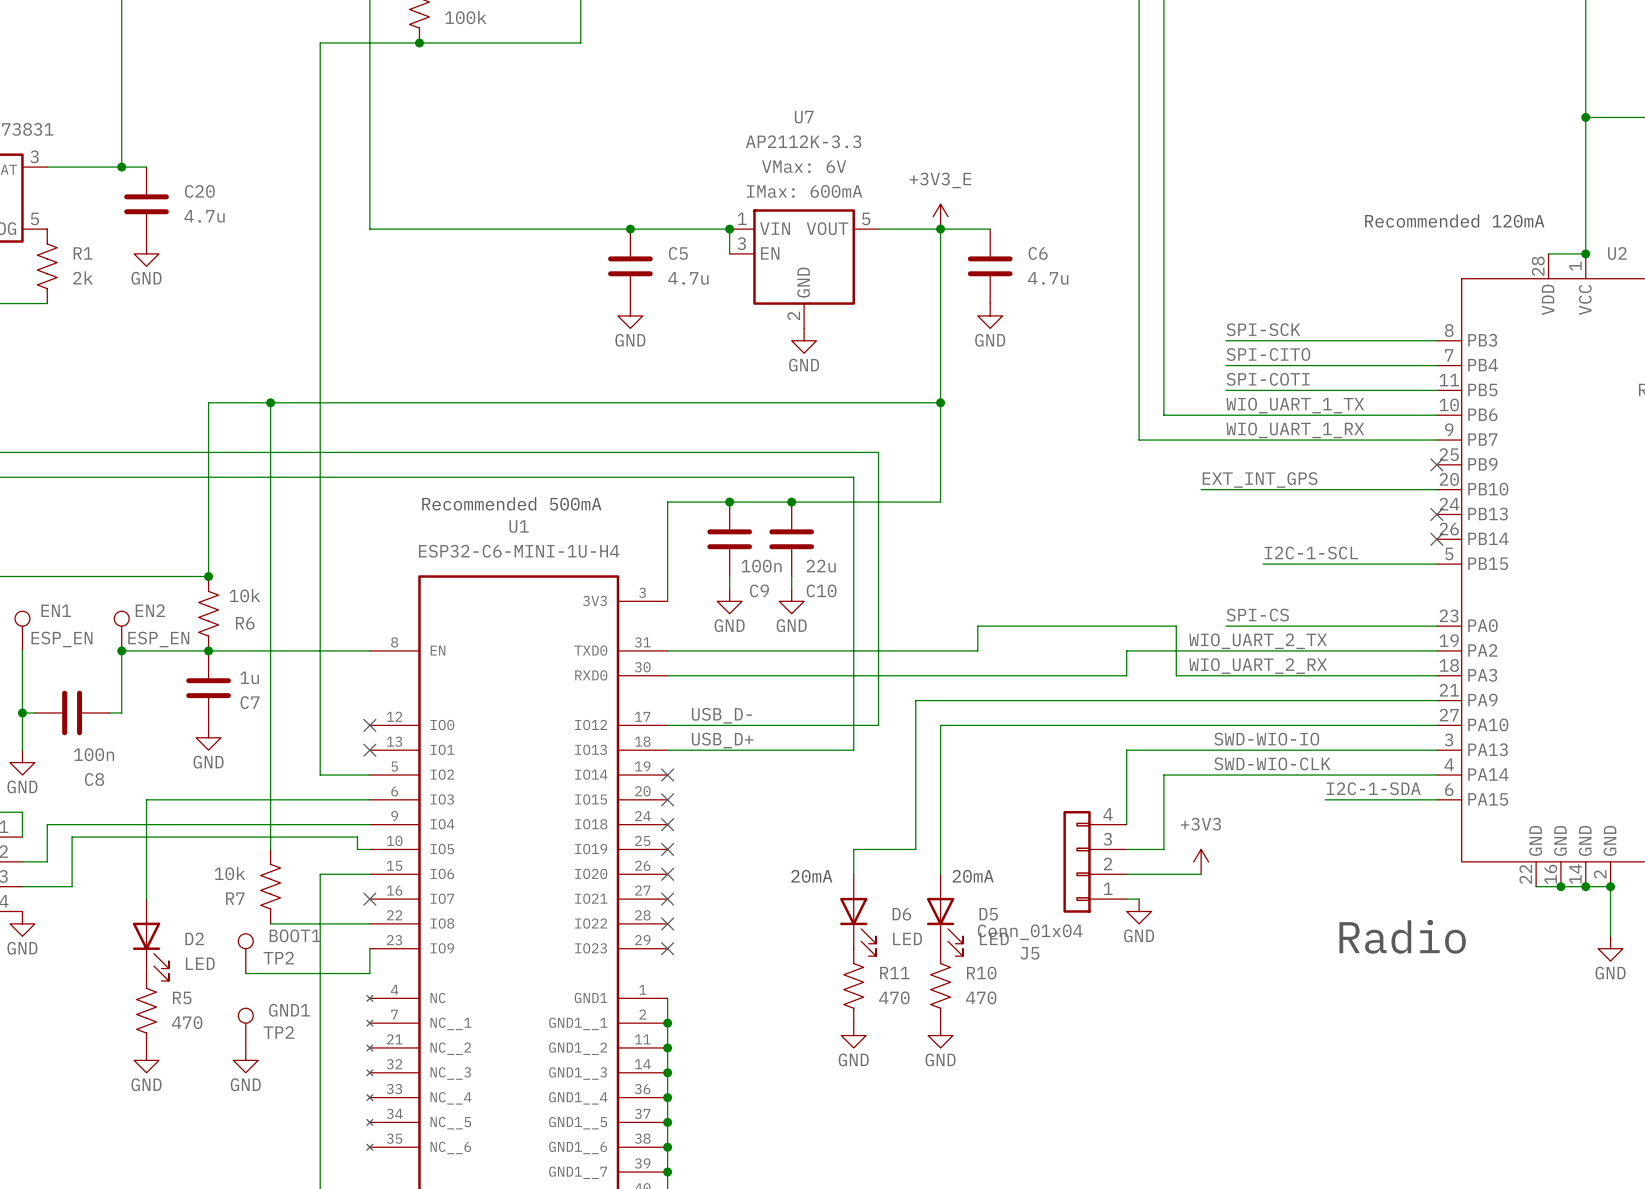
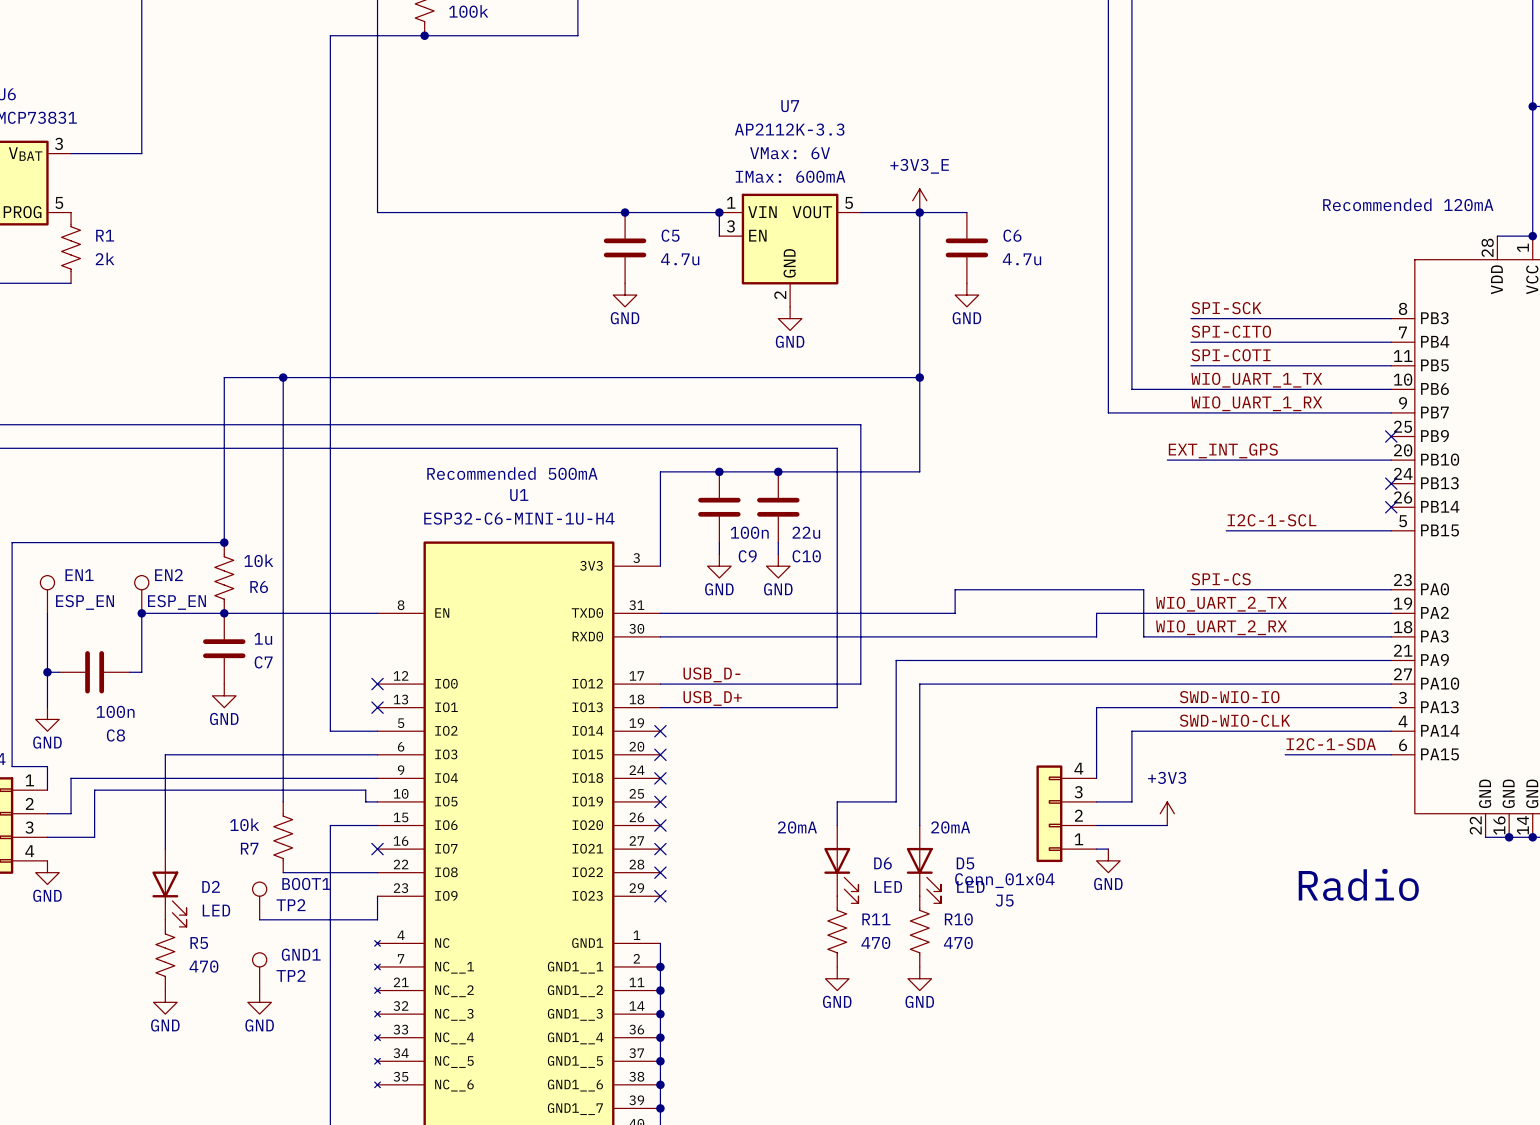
wire: (121, 167) (146, 167) -> none
junction: (121, 167) -> none
C20: 4.7u (146, 204) -> none
power symbol: GND (146, 253) -> none

